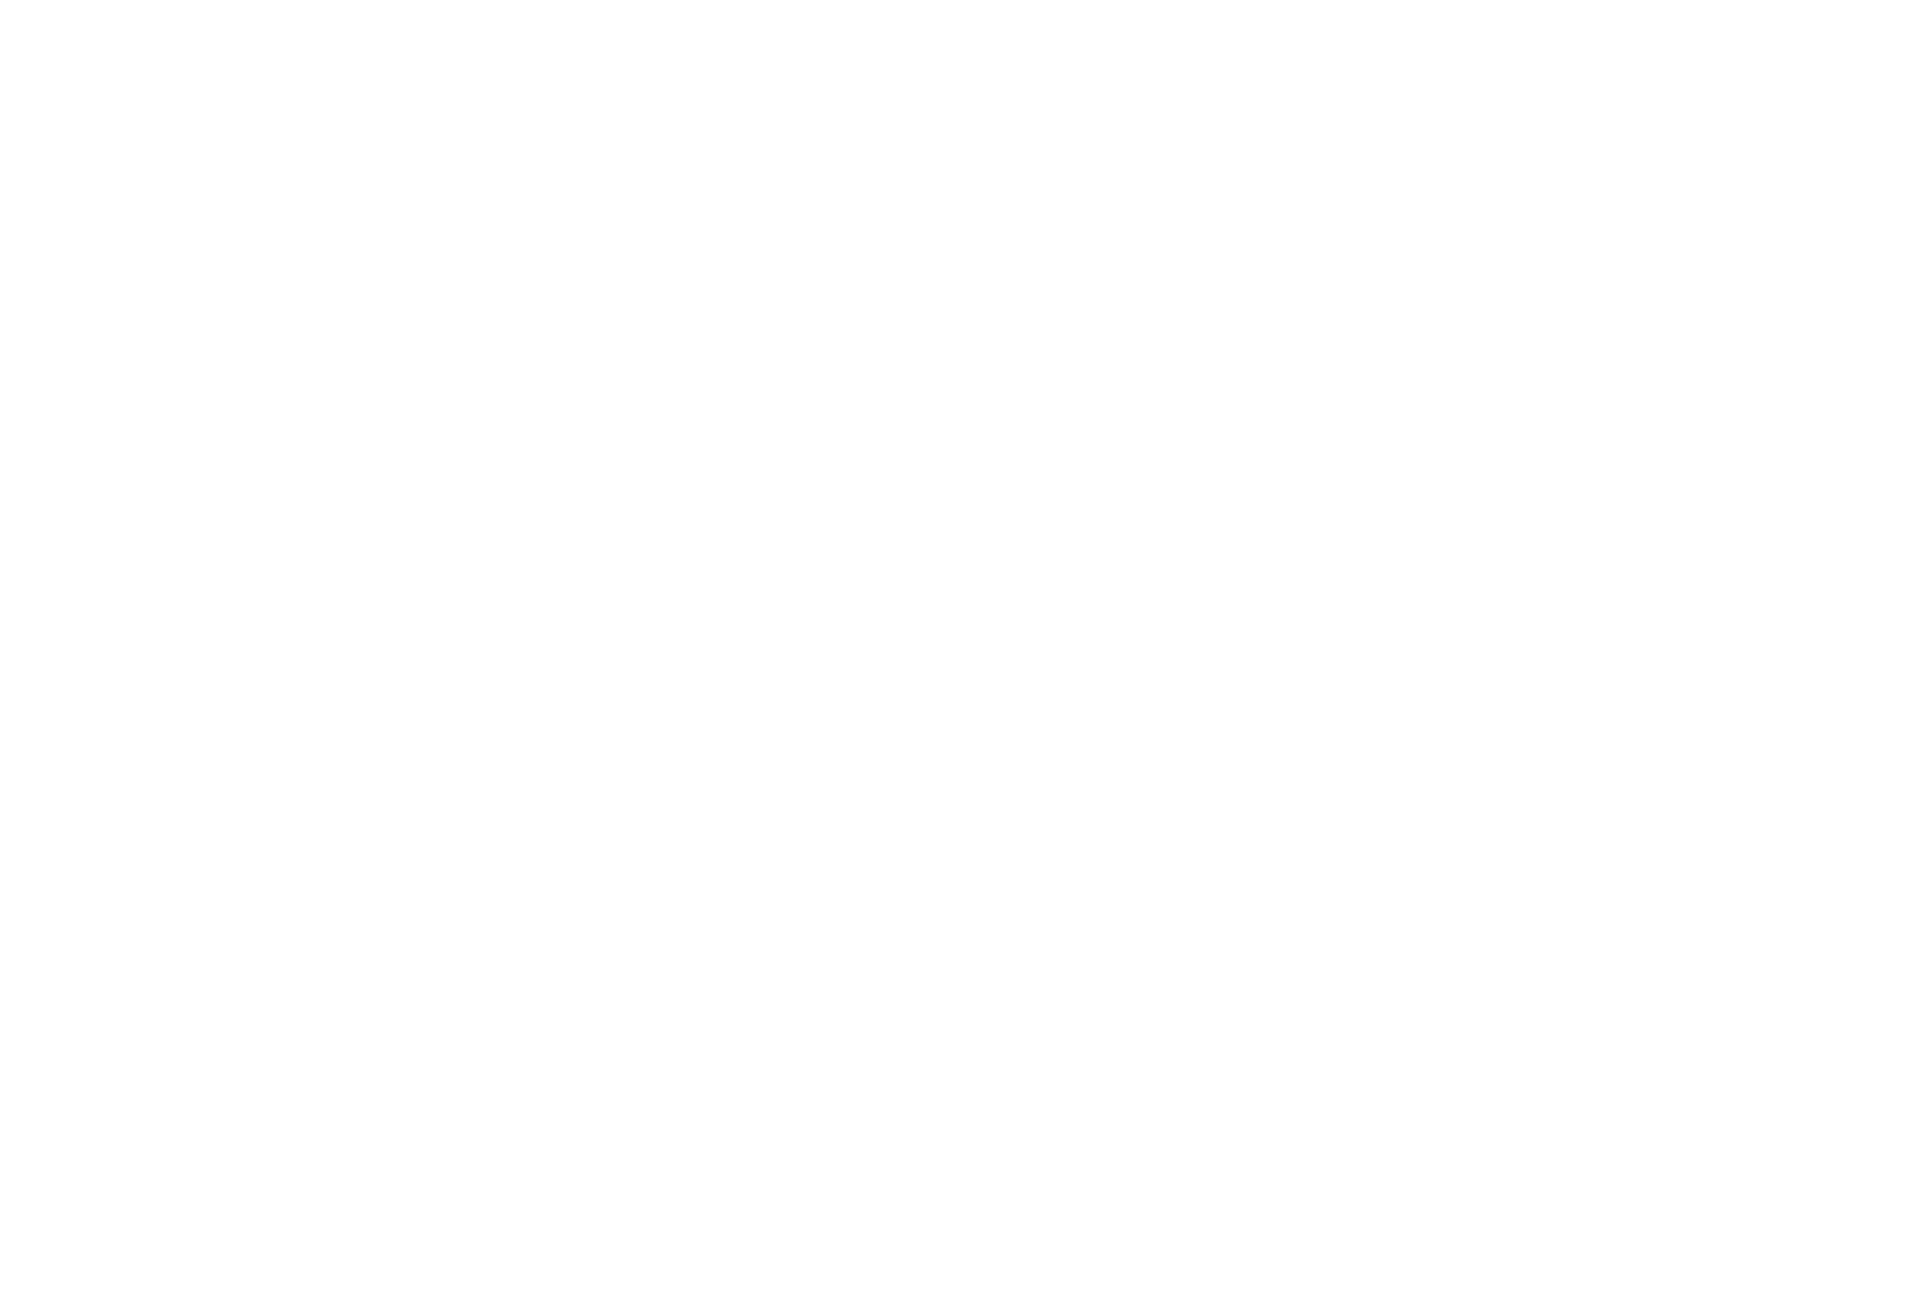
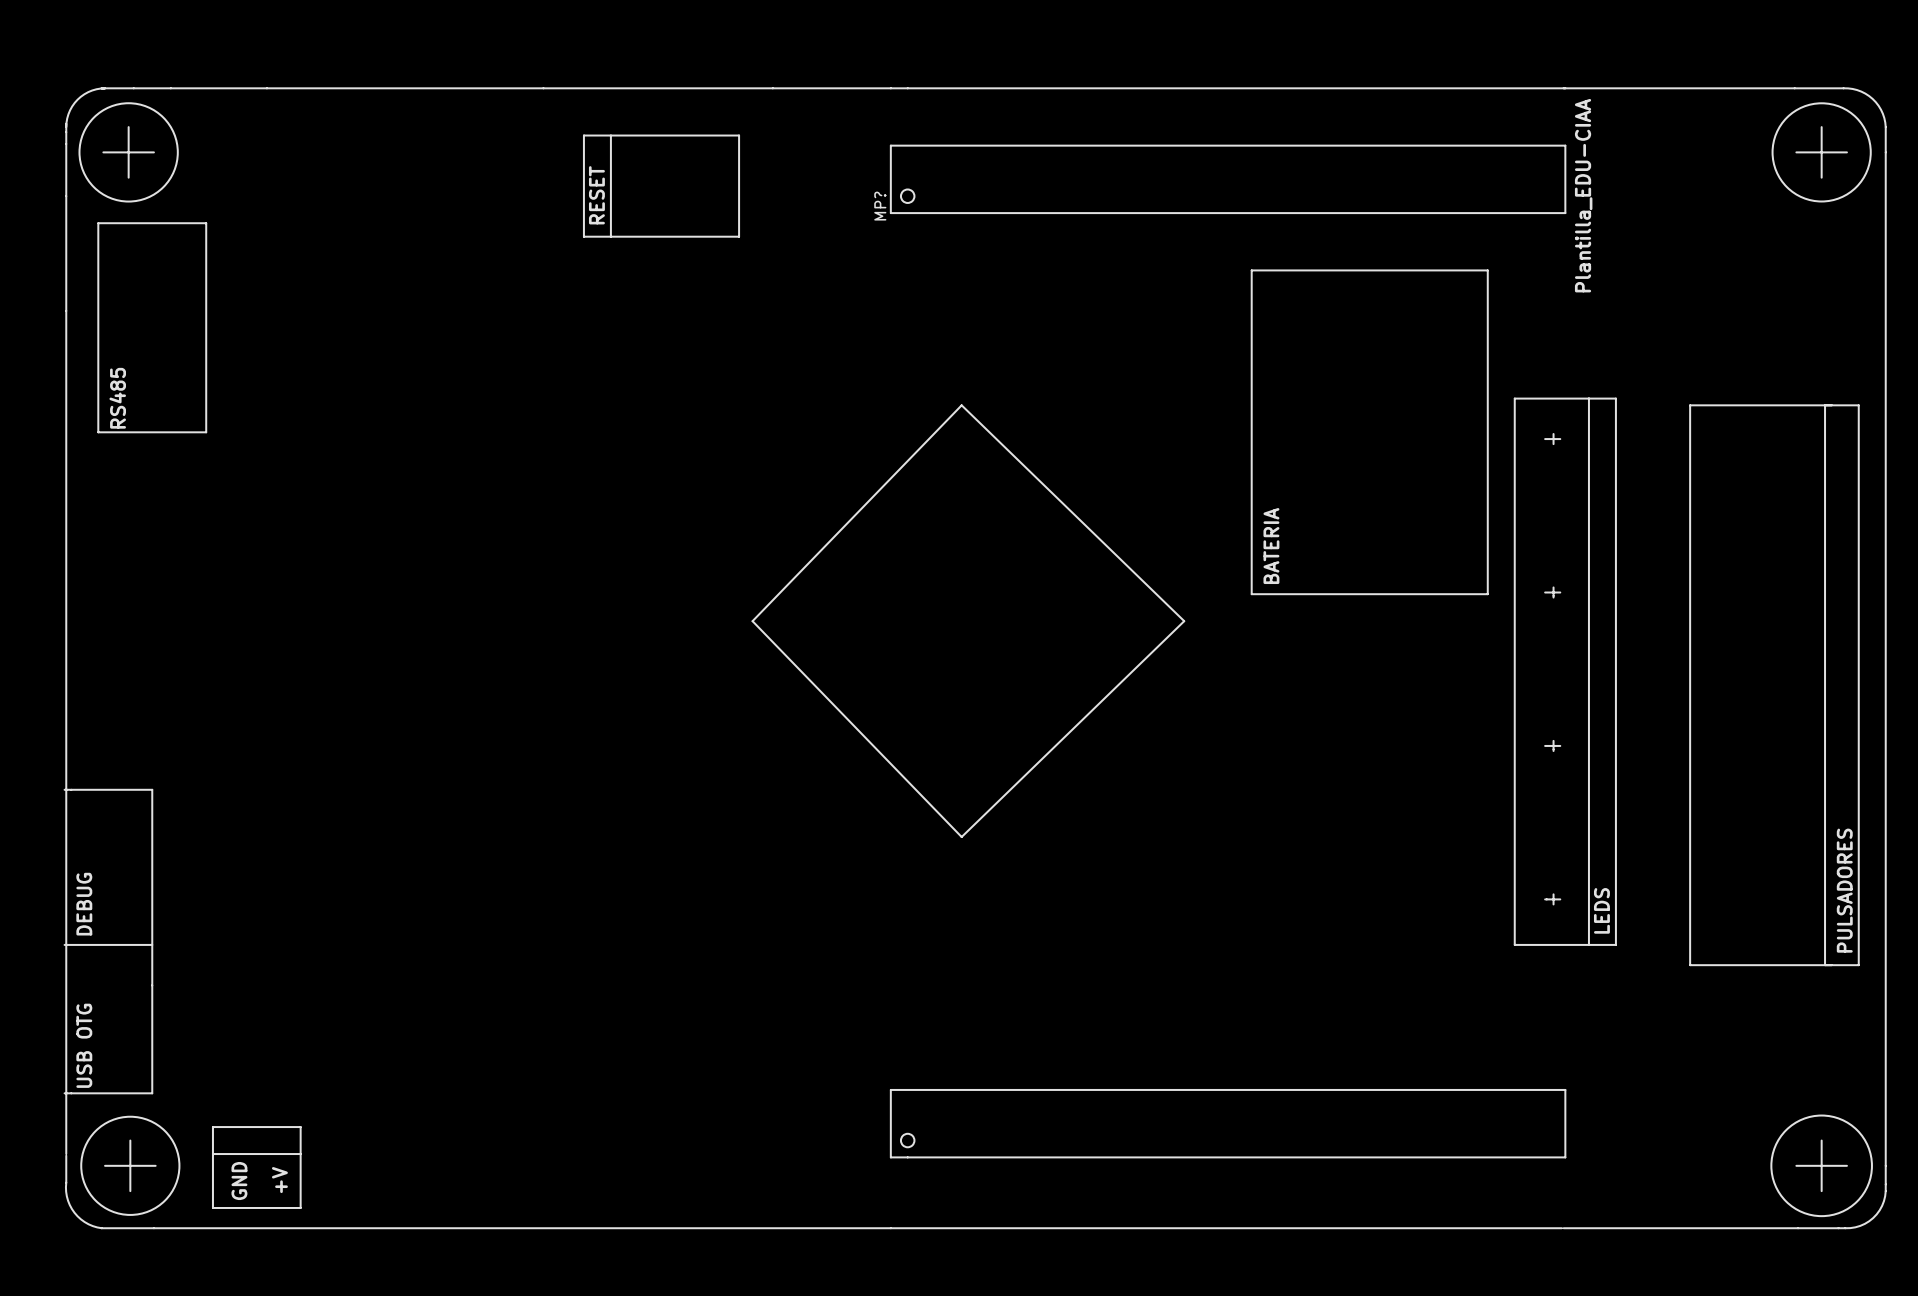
MP?: none -> Plantilla_EDU-CIAA (975, 658)

